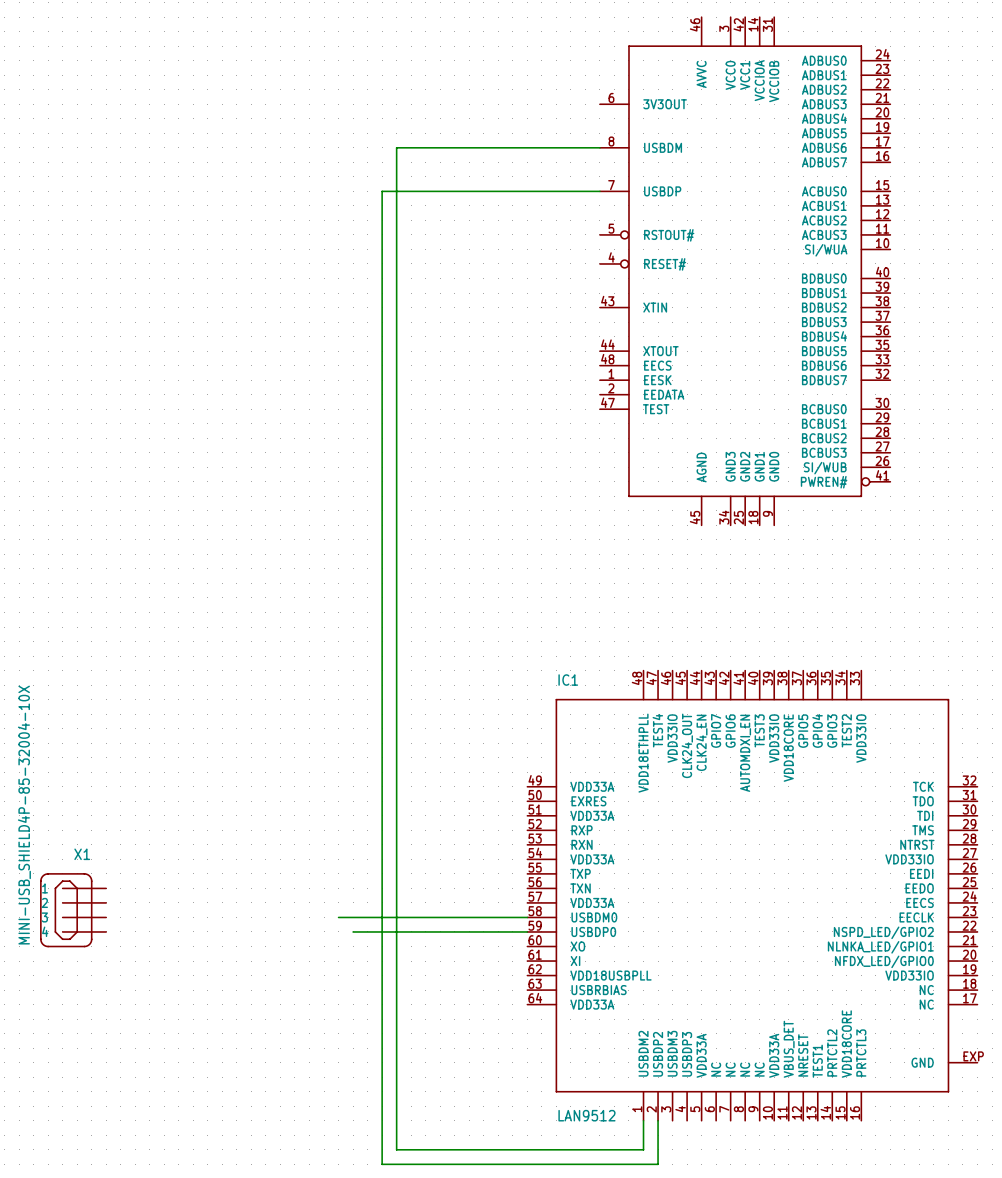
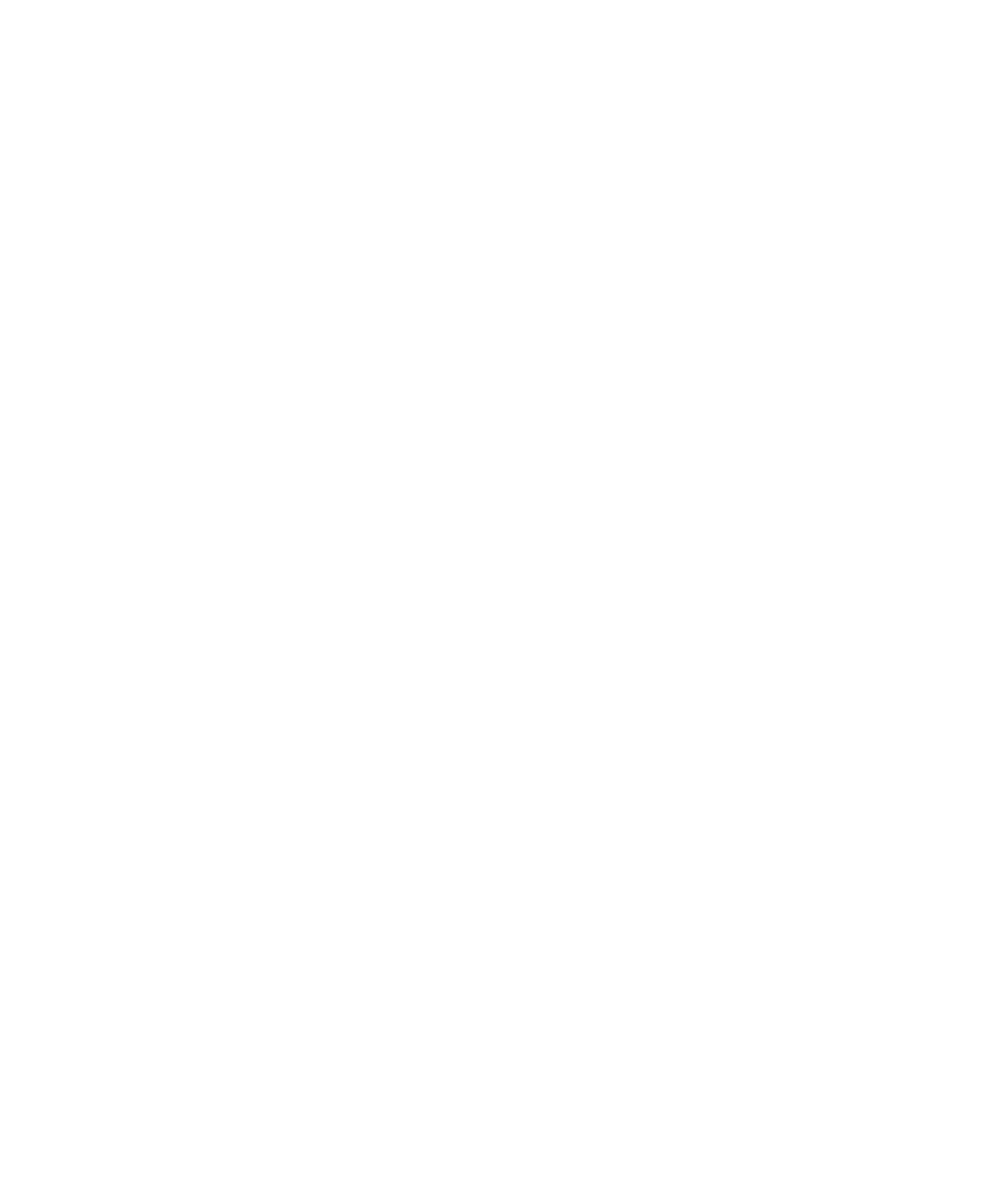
wire: (599, 147) (396, 147) (396, 1149) (643, 1149) (643, 1120) -> none
wire: (599, 191) (382, 191) (382, 1164) (658, 1164) (658, 1120) -> none
part: (745, 271) -> none
IC1: LAN9512 (752, 895) -> none
X1: MINI-USB_SHIELD4P-85-32004-10X (73, 910) -> none
wire: (338, 917) (527, 917) -> none
wire: (353, 931) (527, 931) -> none

